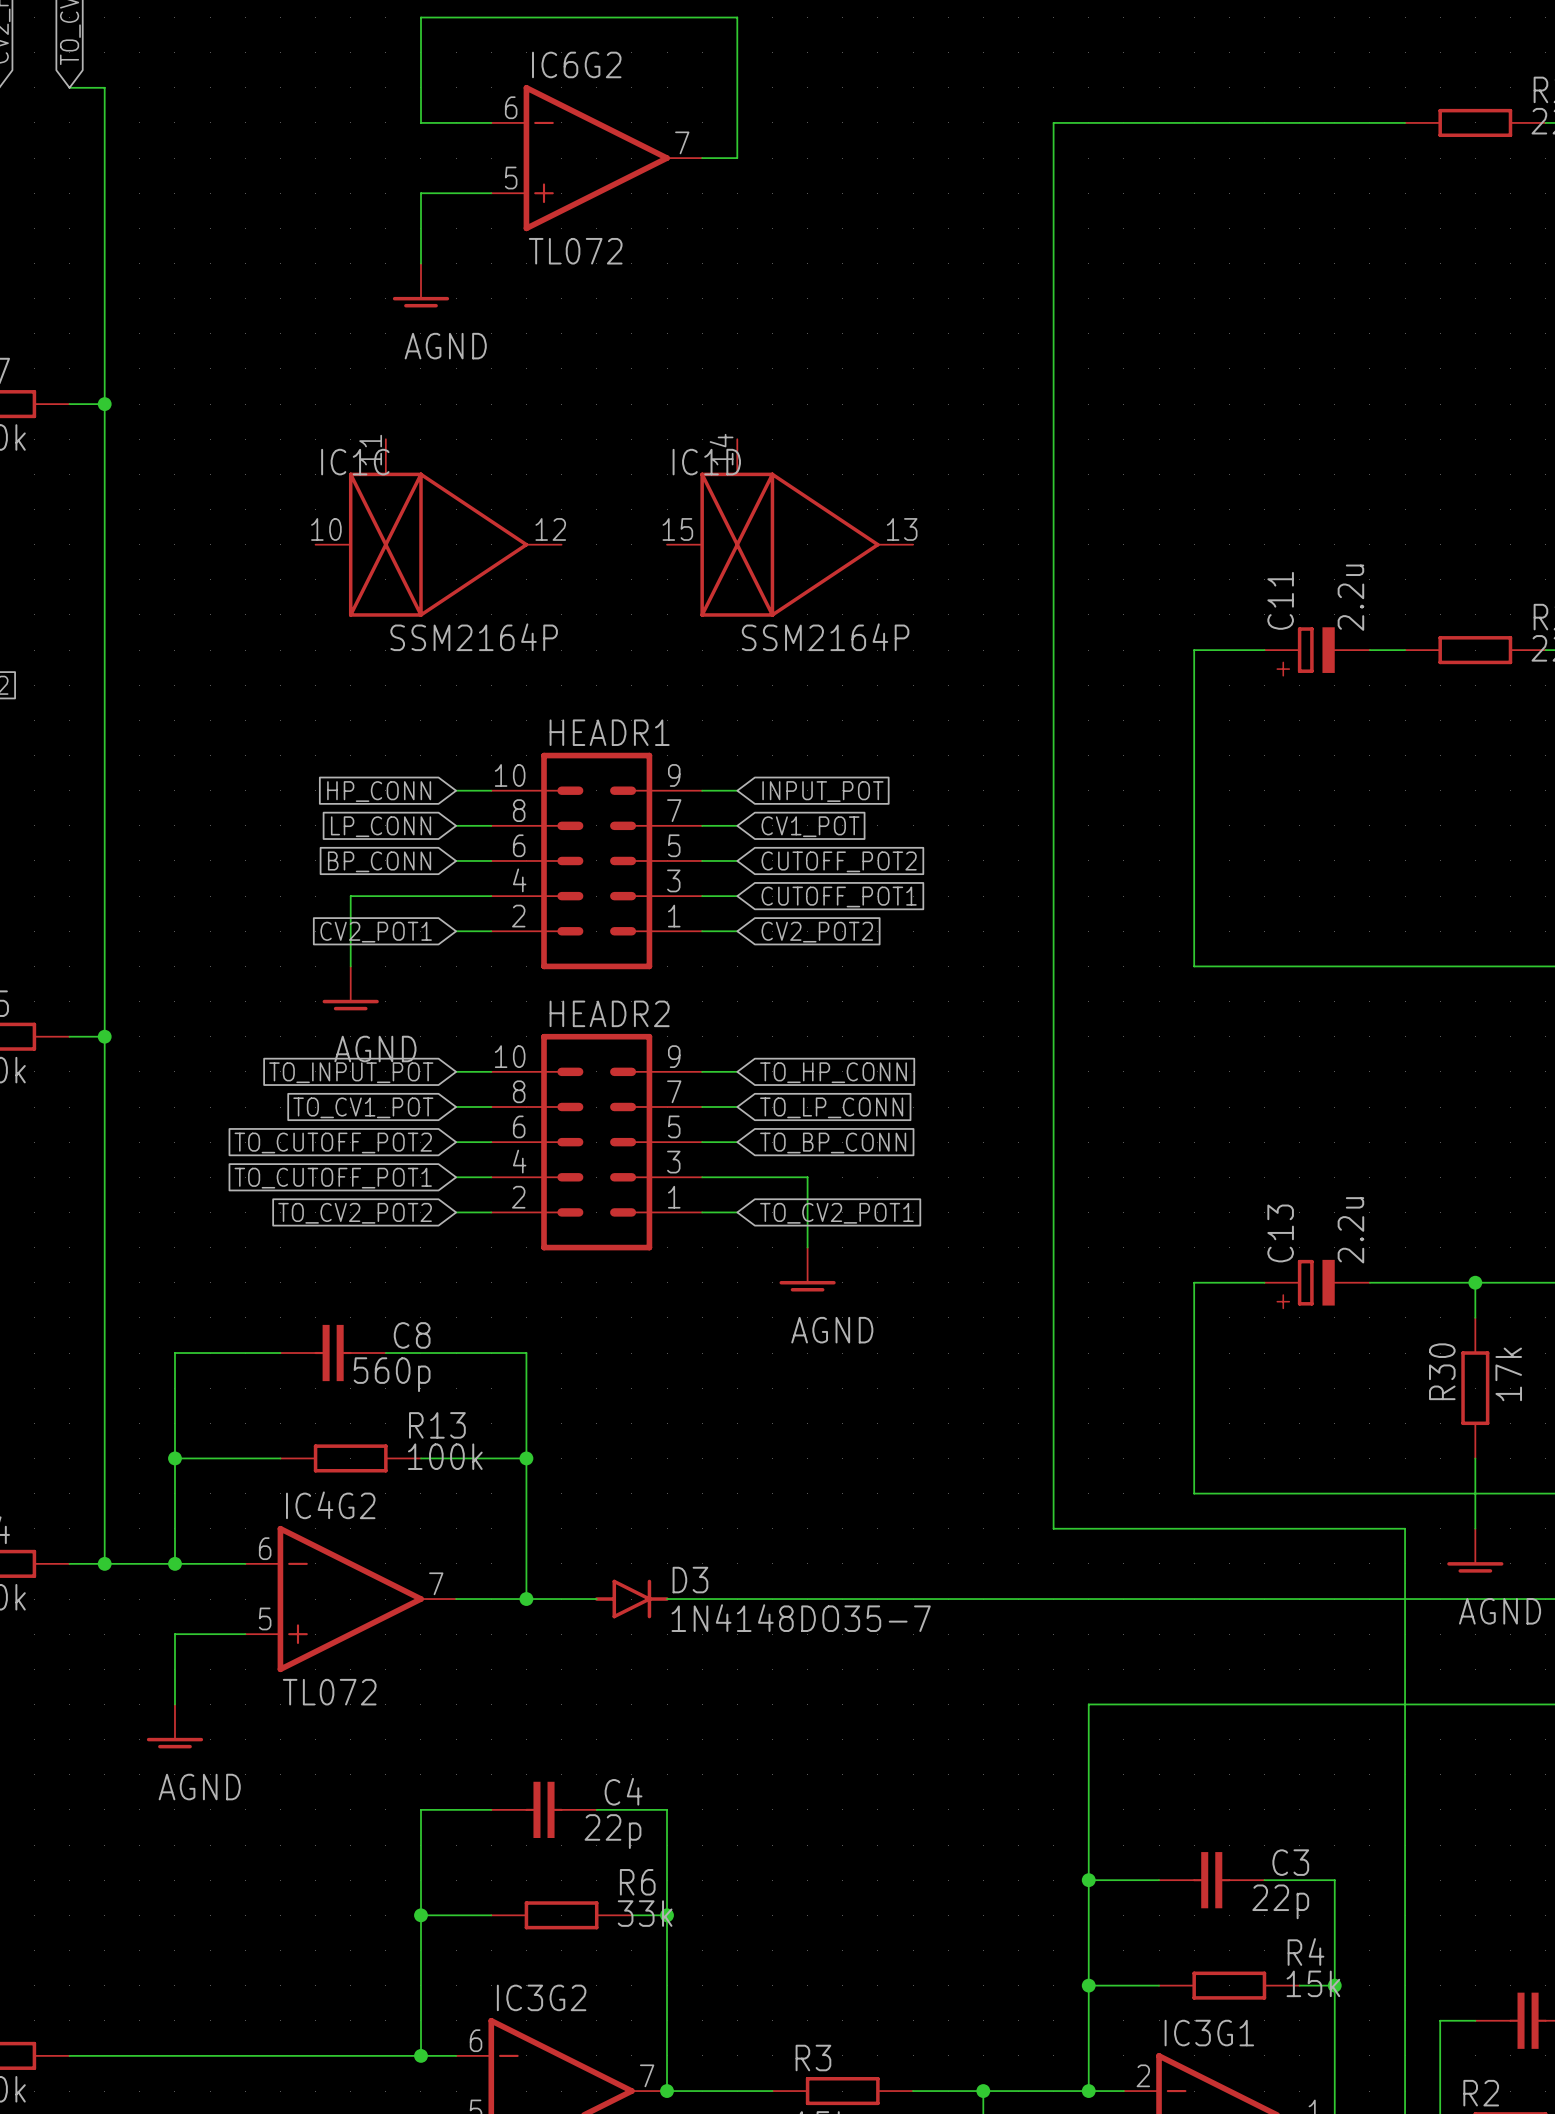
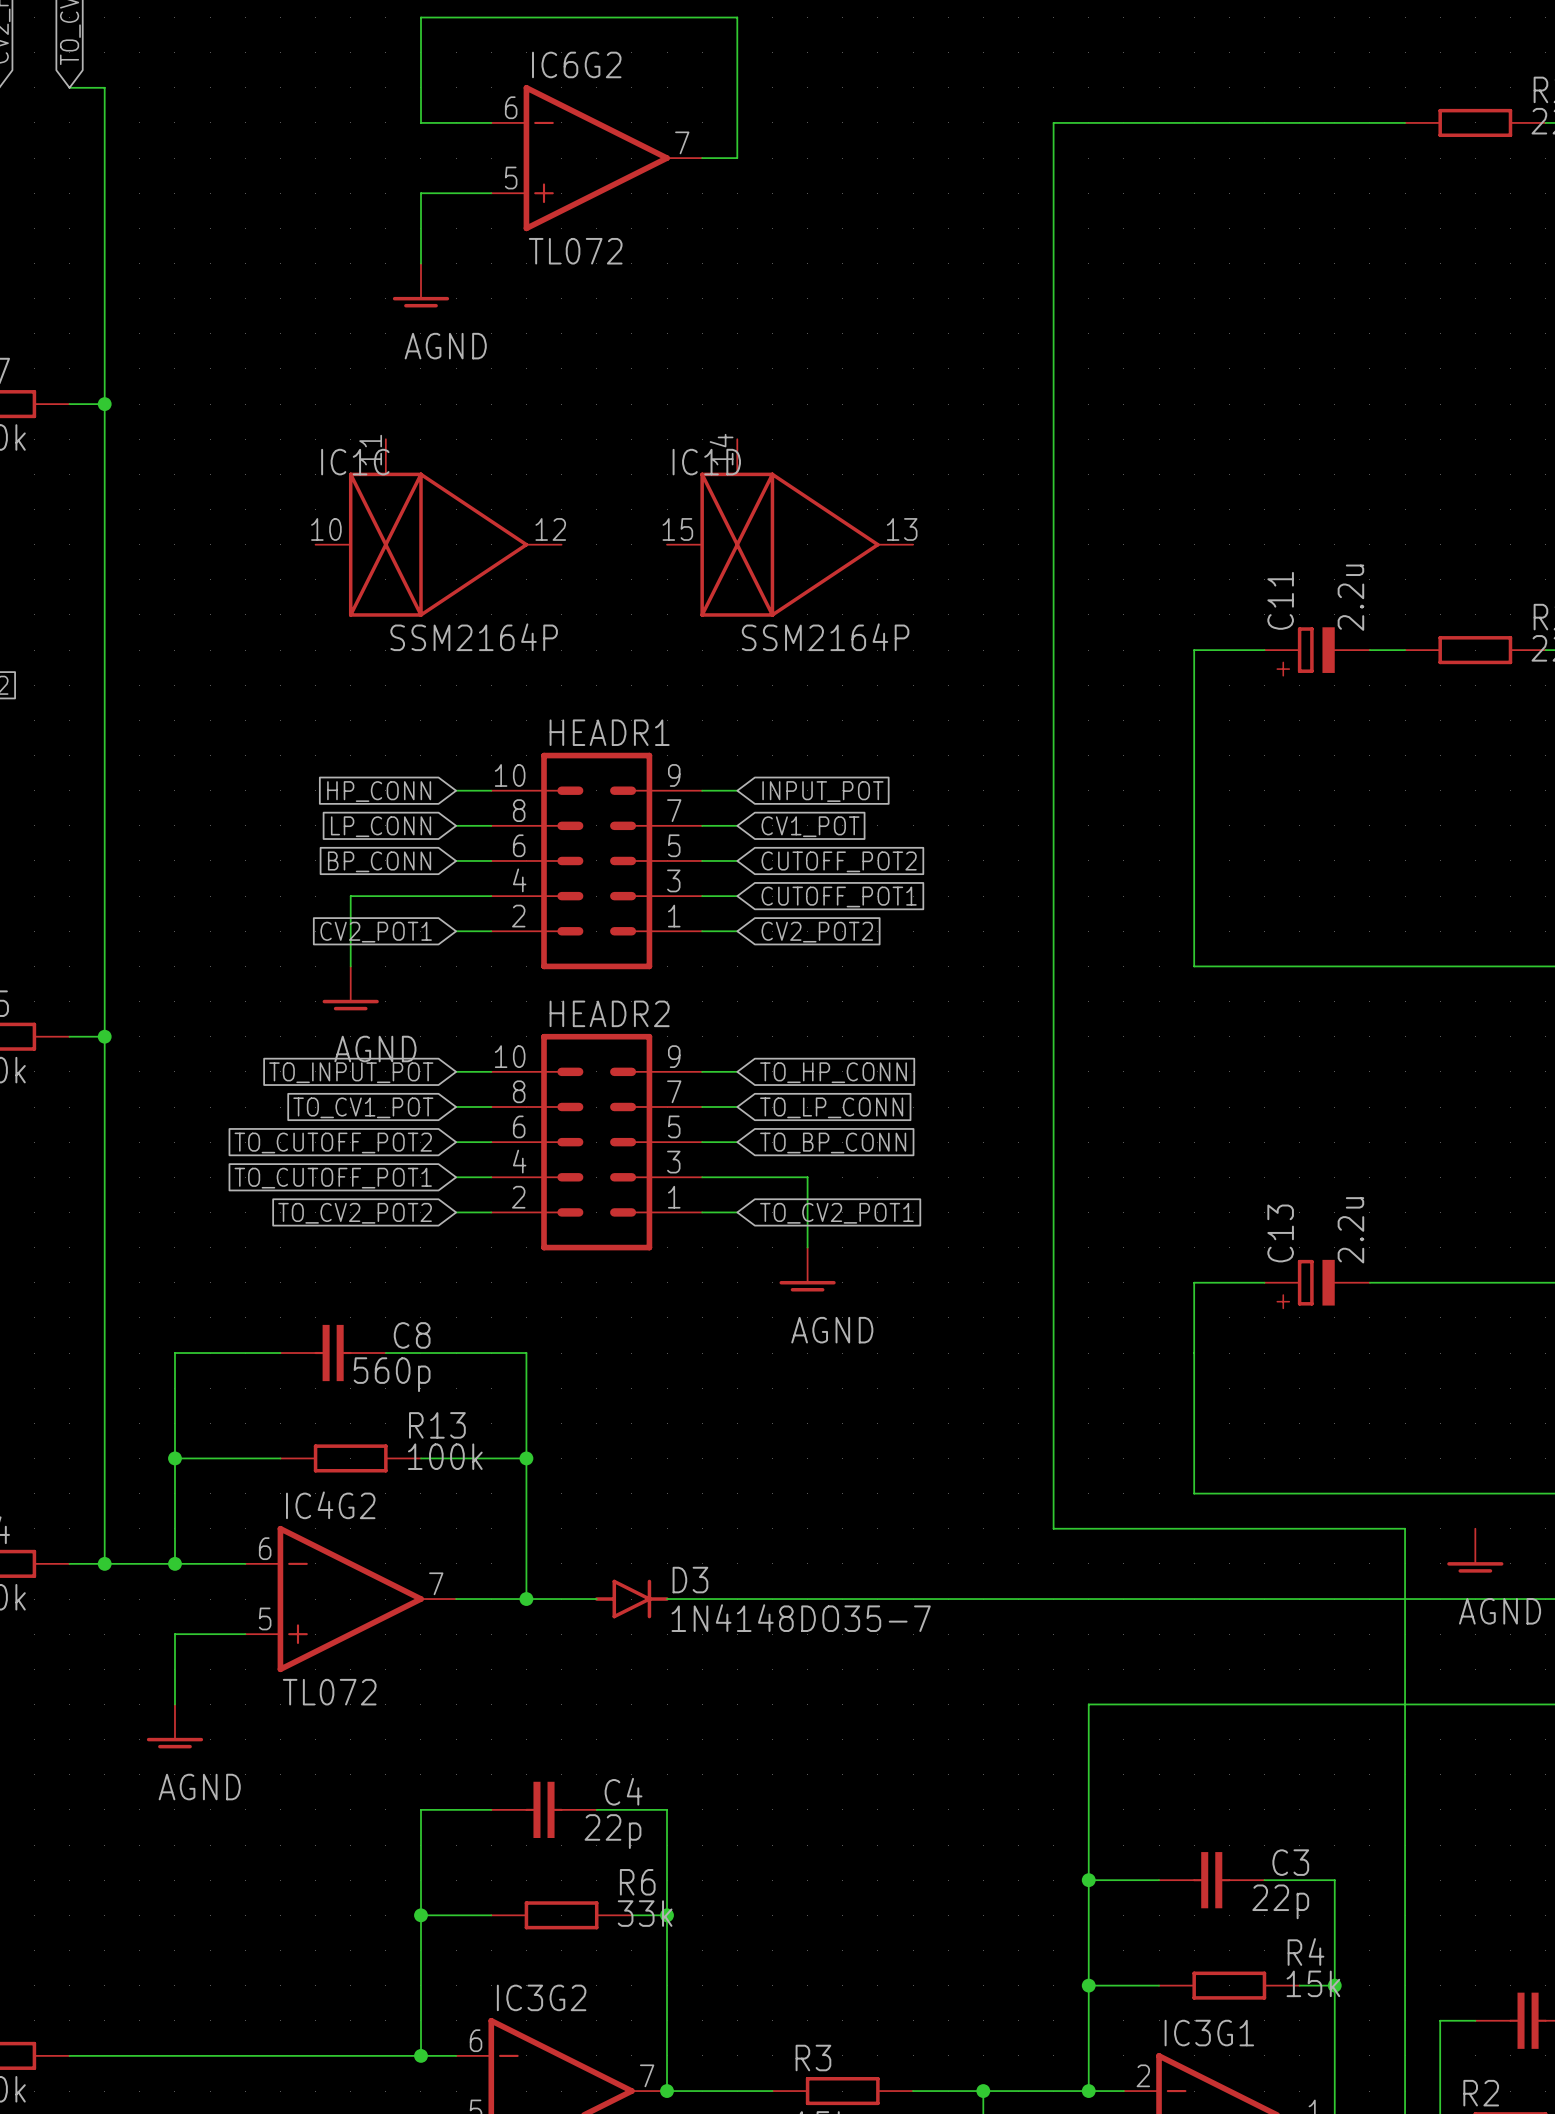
wire: (1475, 1282) (1475, 1317) -> none
junction: (1475, 1282) -> none
R30: 17k (1475, 1388) -> none
wire: (1475, 1458) (1475, 1528) -> none

